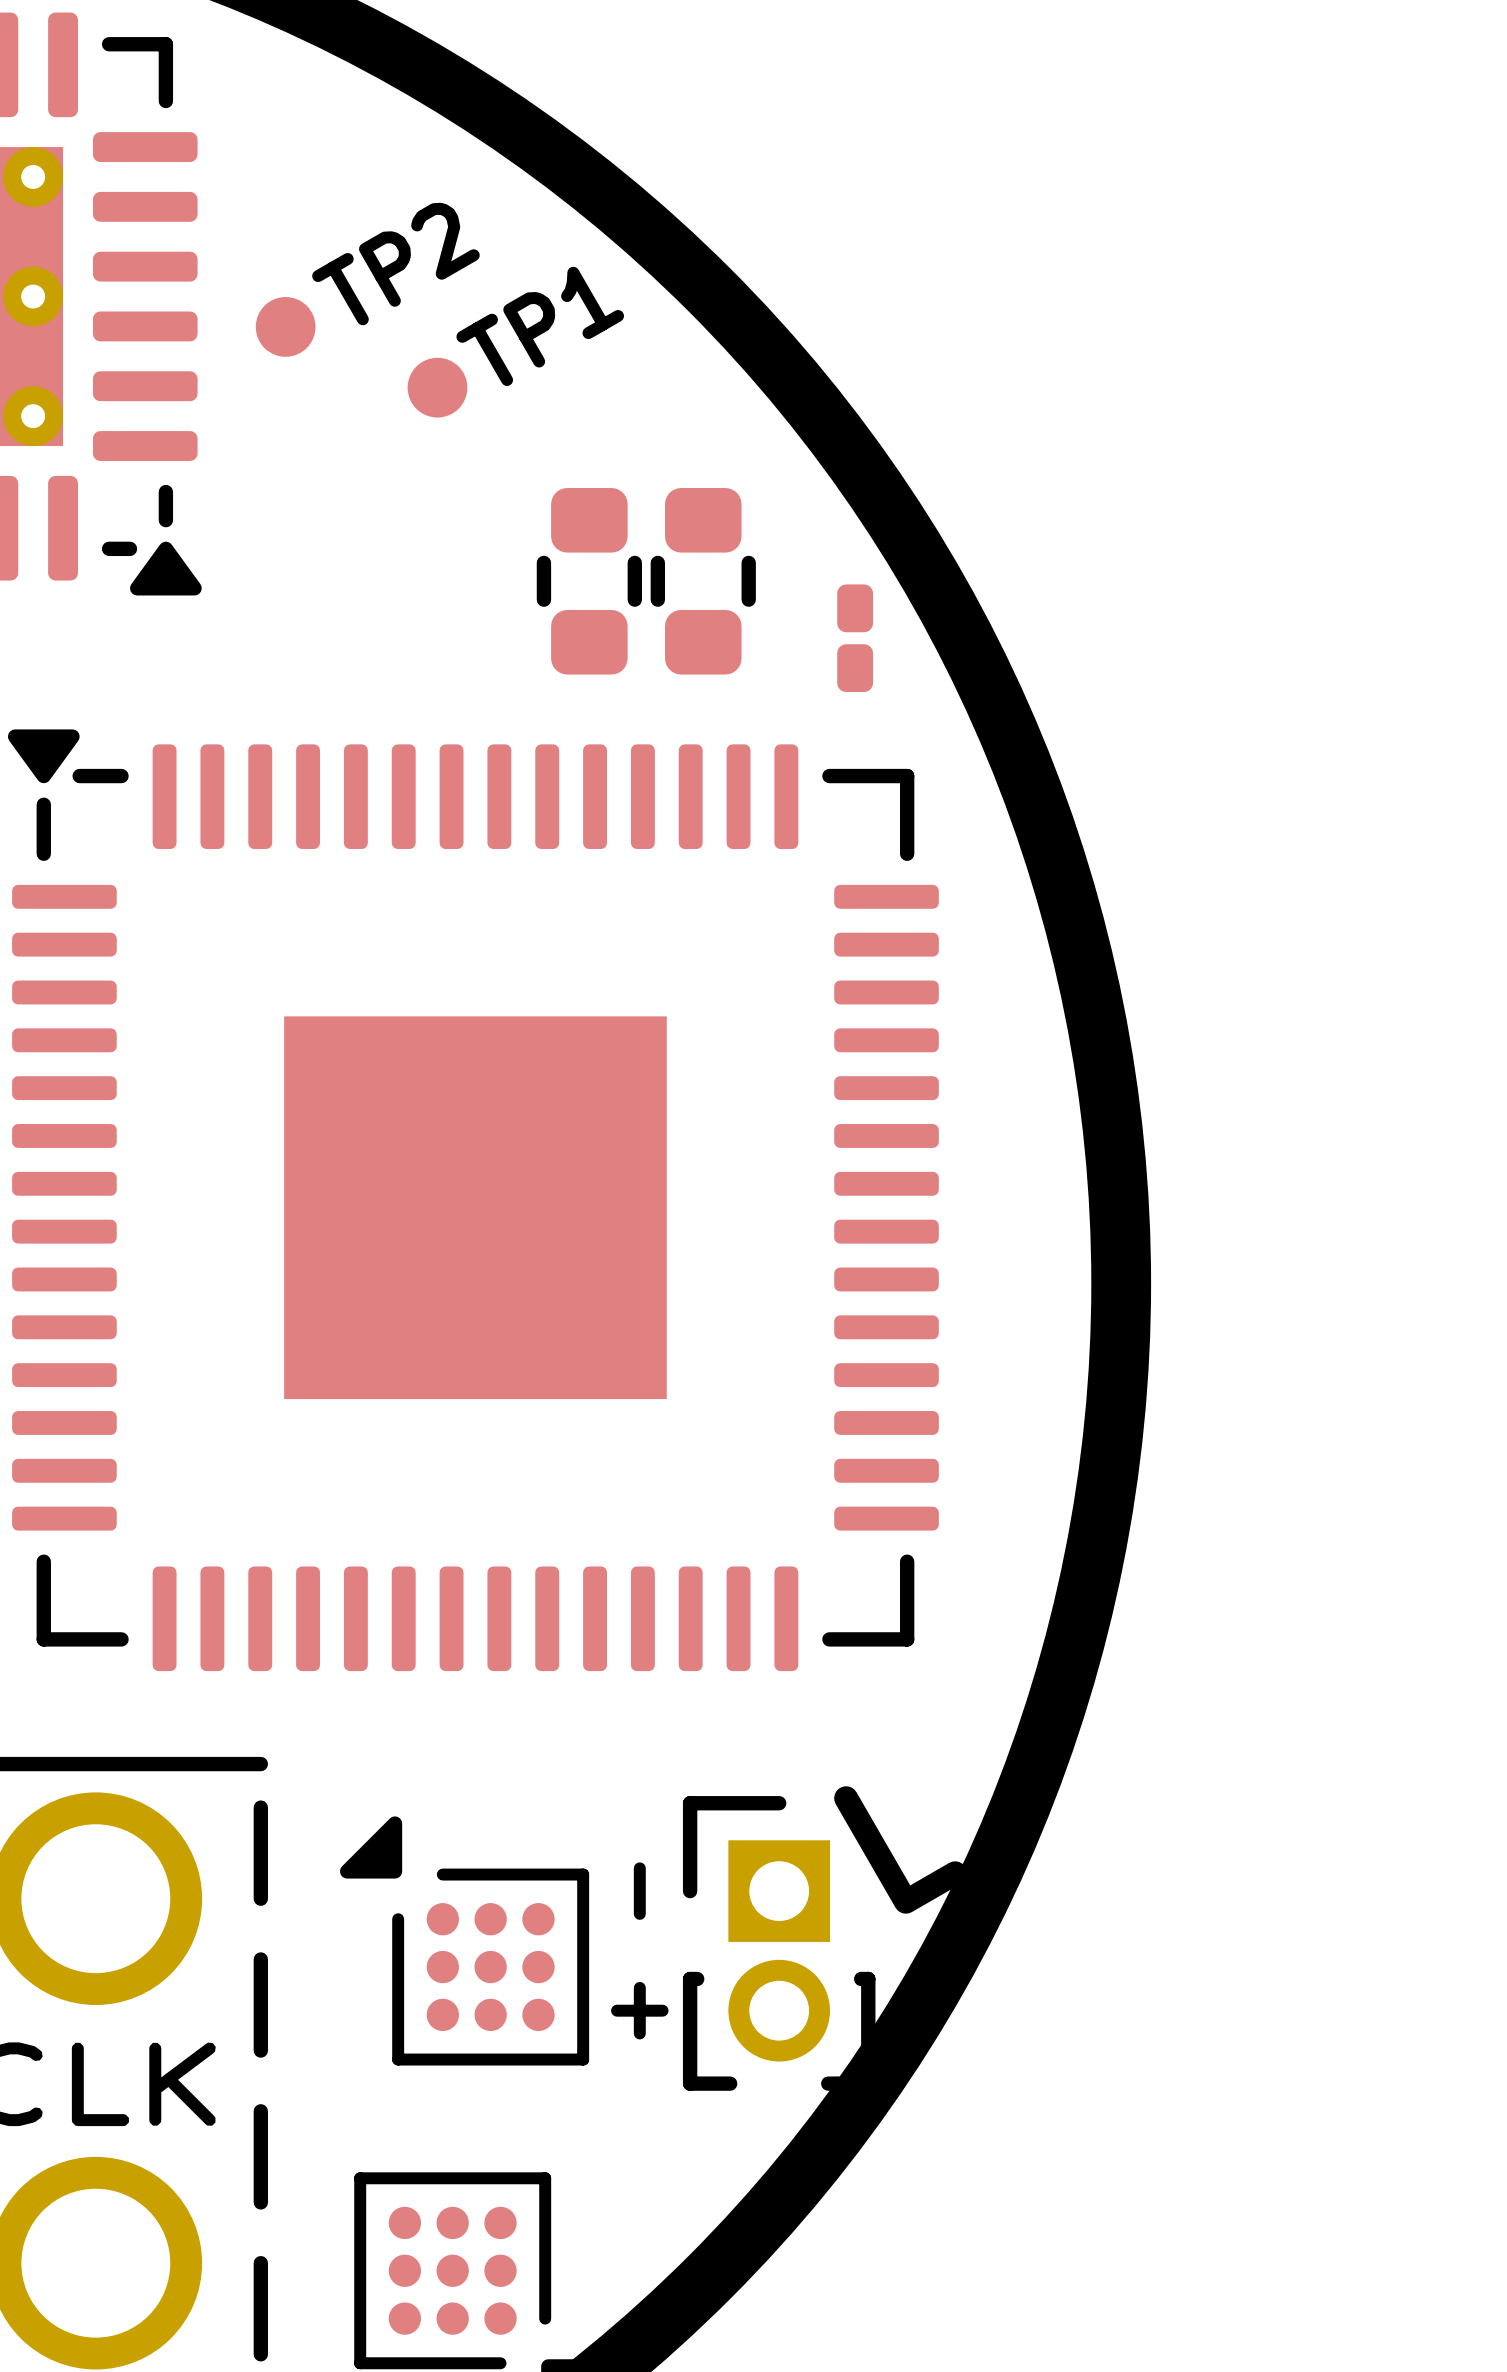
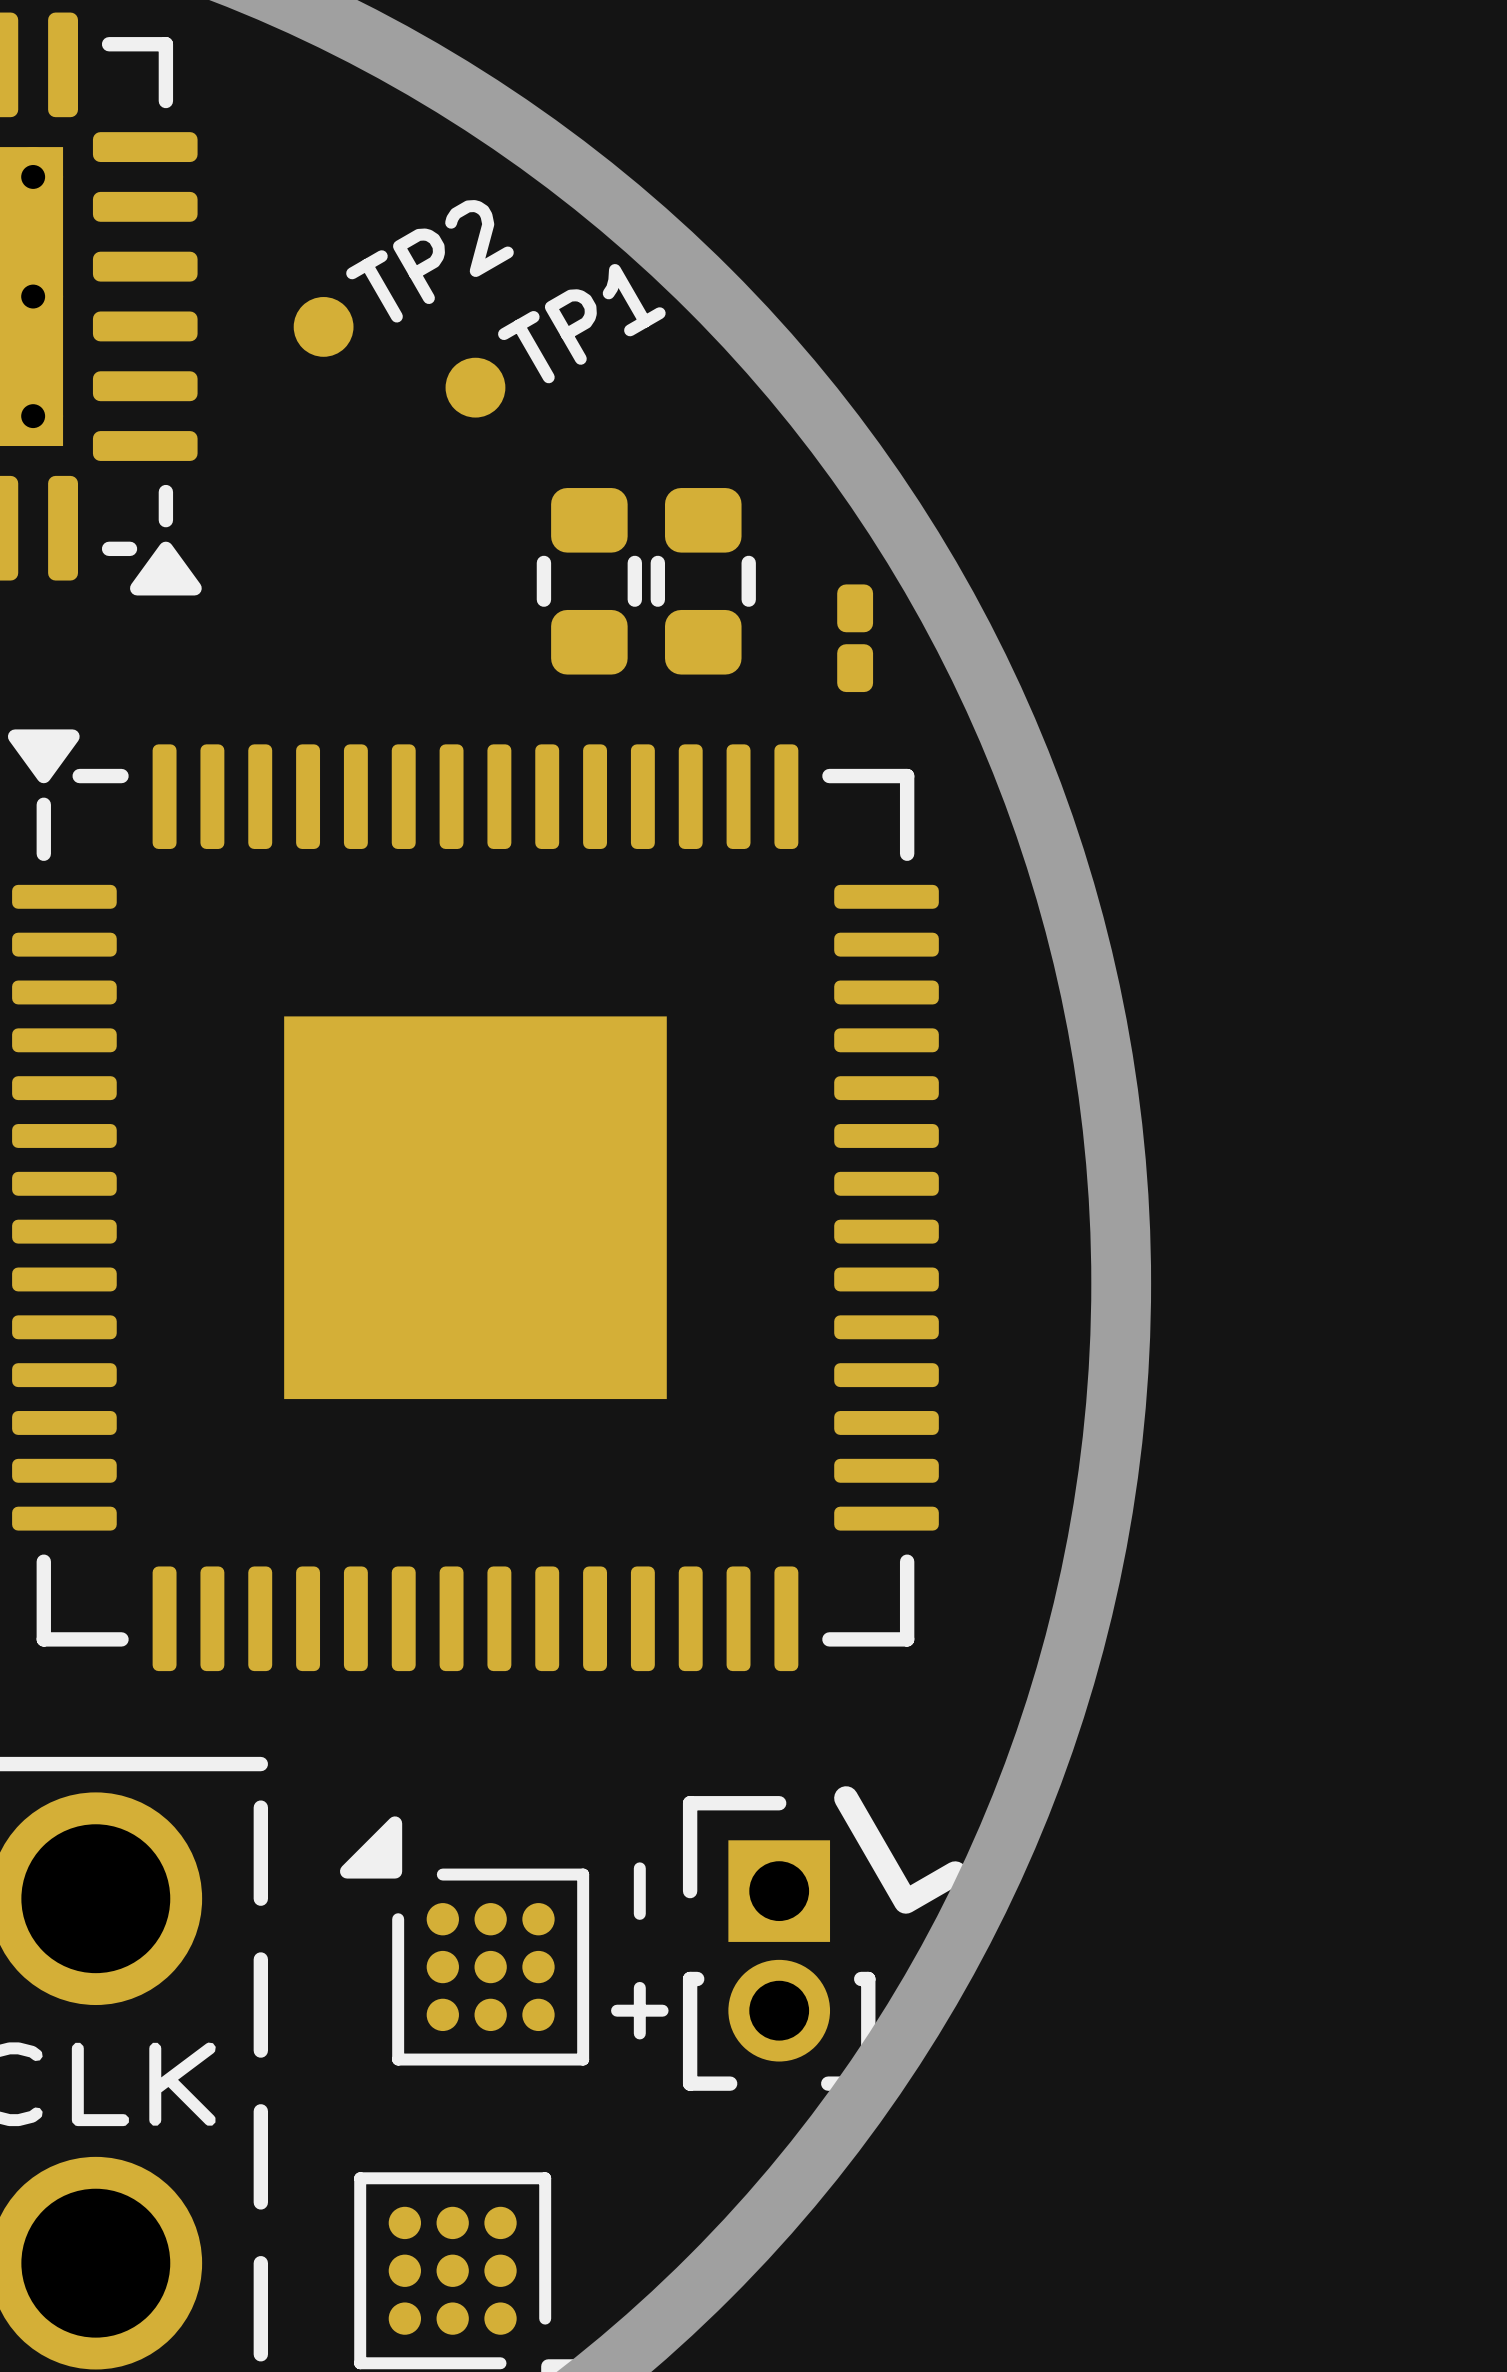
TP2 name position: TP2 (395, 264) -> TP2 (429, 261)
TP2 position: (285, 326) -> (323, 326)
TP1 name position: TP1 (540, 326) -> TP1 (581, 323)
TP1 position: (437, 387) -> (475, 387)

